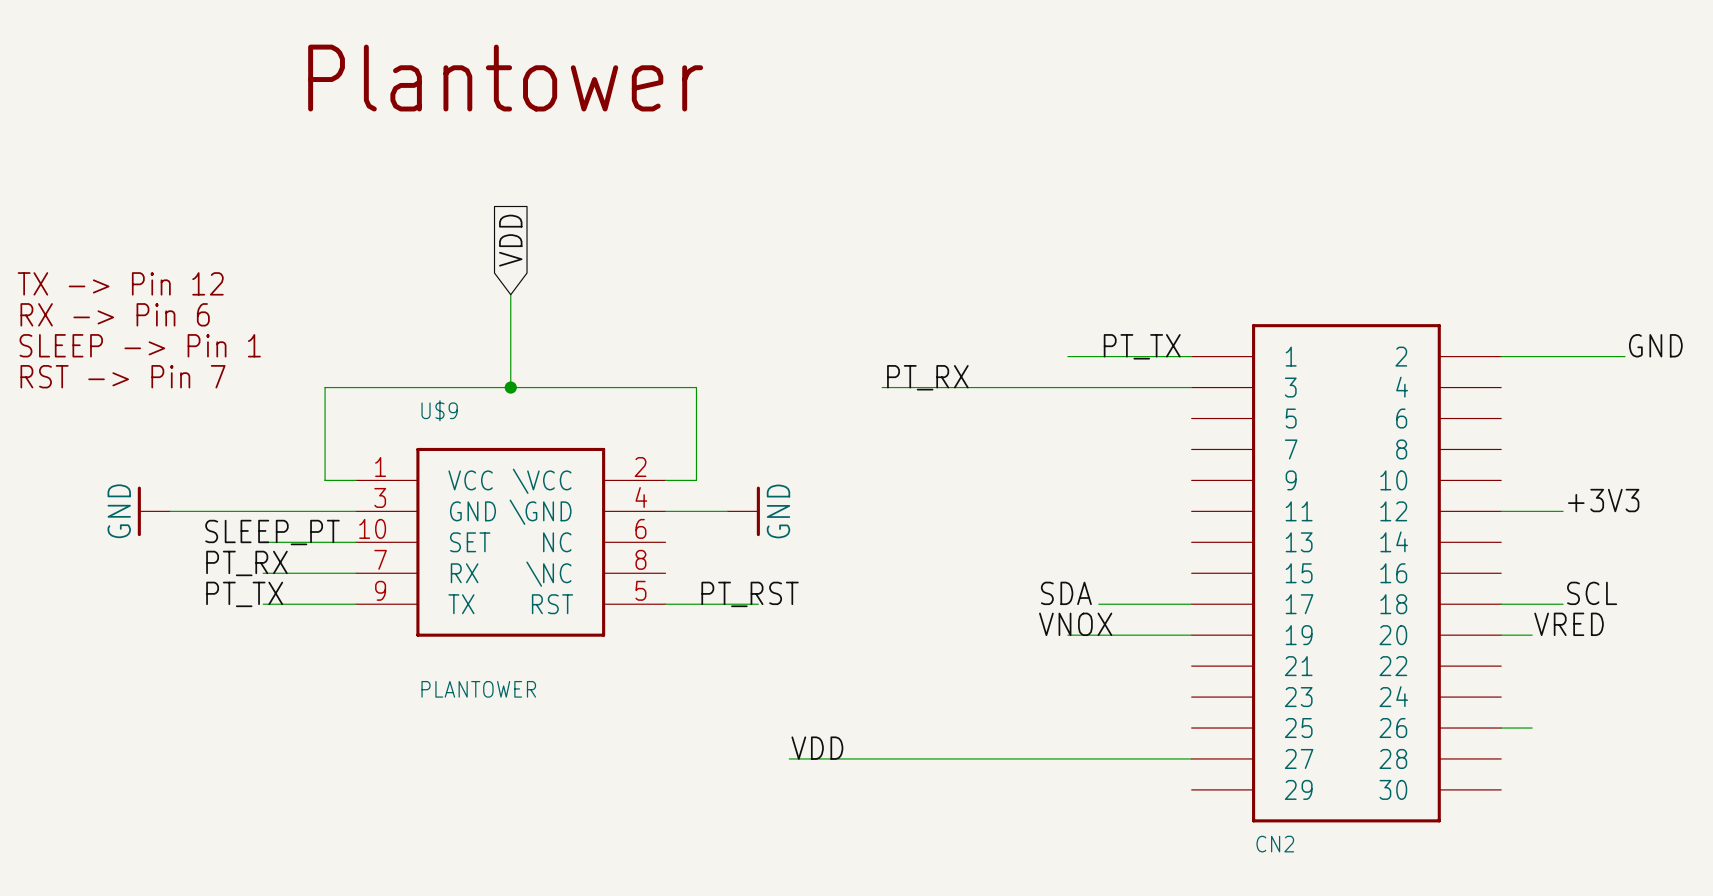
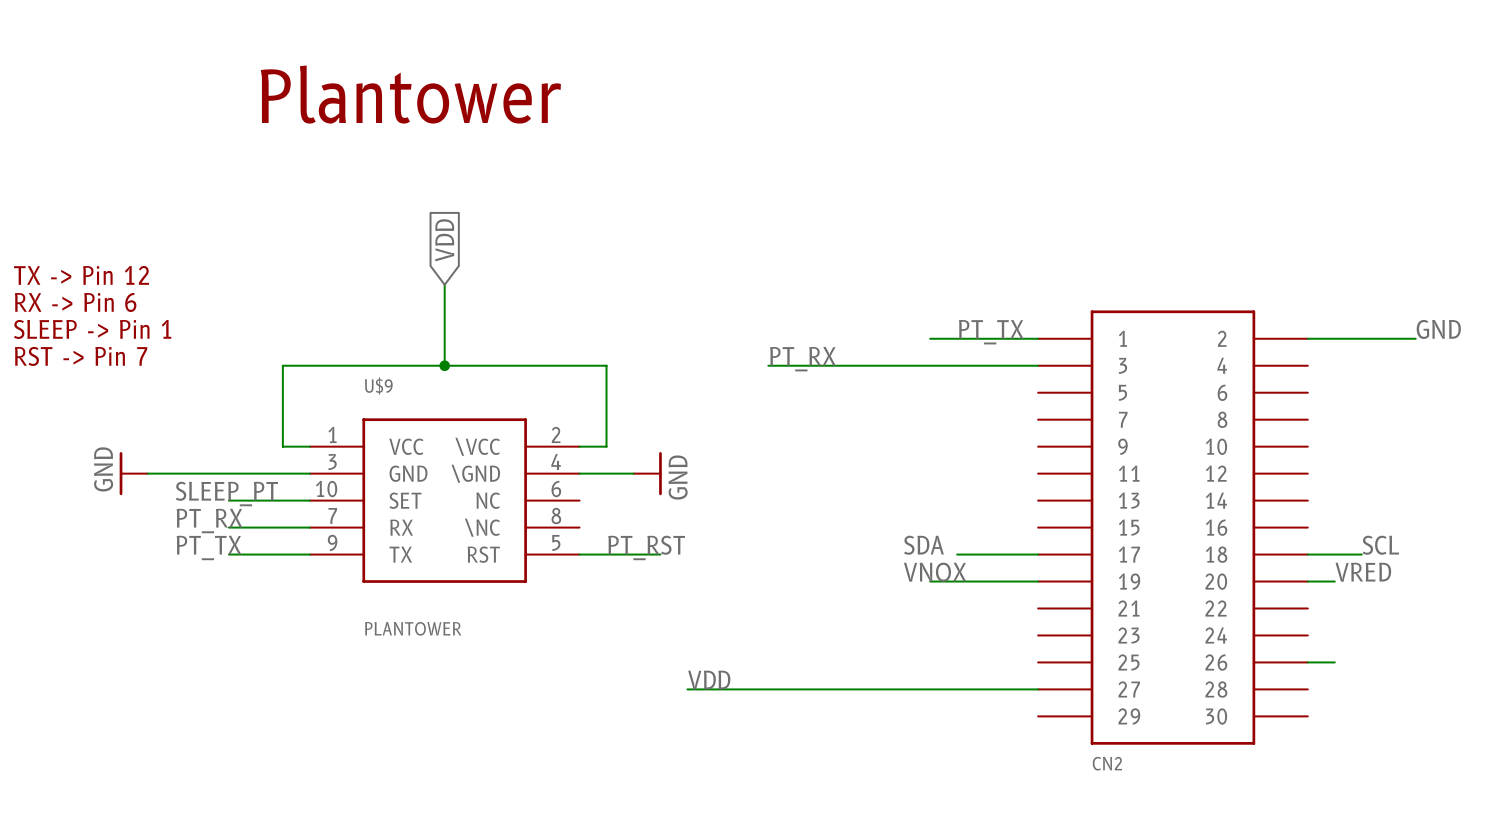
label: +3V3 (1603, 500) -> none
wire: (1501, 511) (1563, 511) -> none

